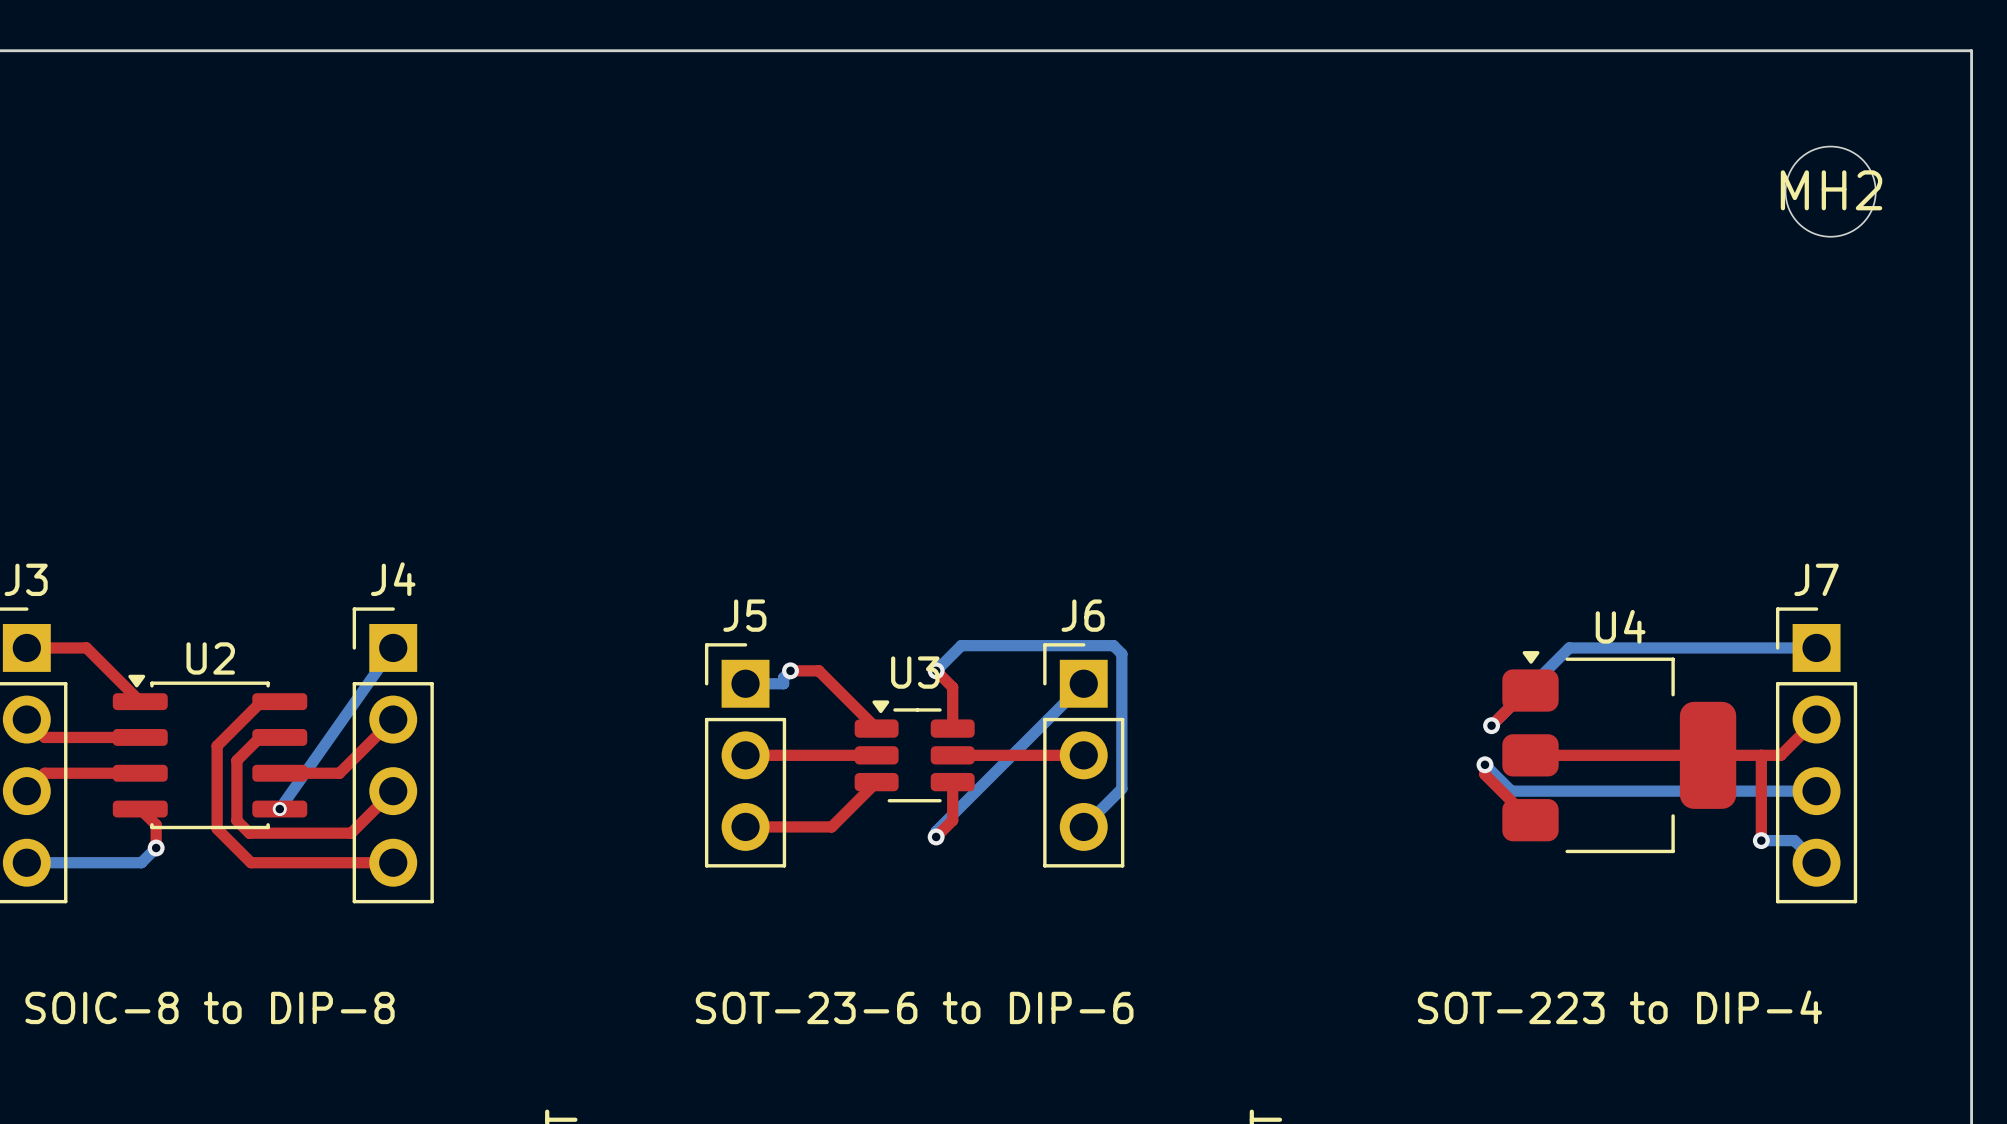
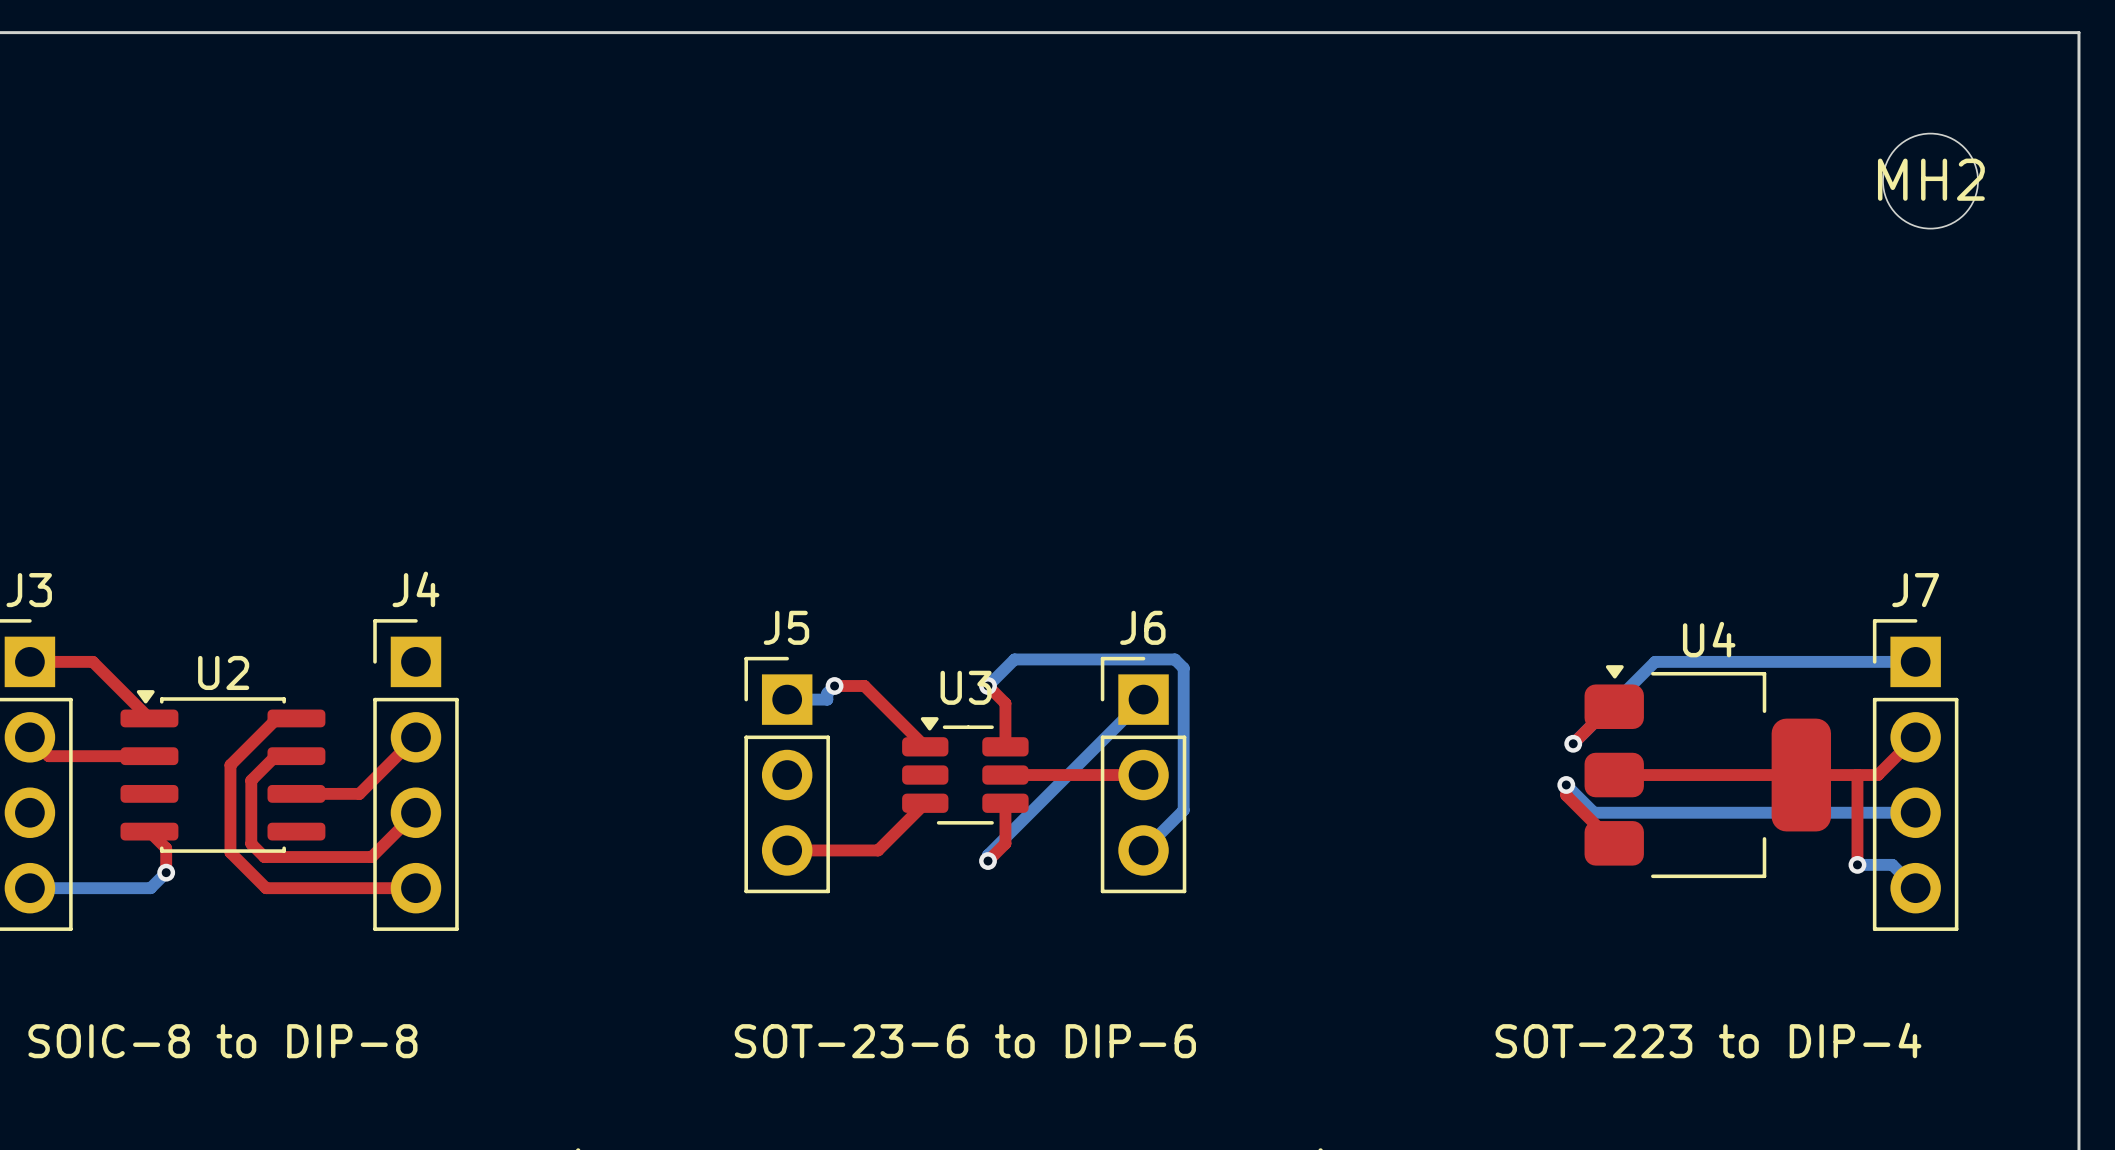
bottom track: (393, 647) (279, 809) -> none
top track: (745, 755) (876, 755) -> none
top track: (140, 773) (44, 773) (26, 791) -> none
via: (279, 809) -> none

